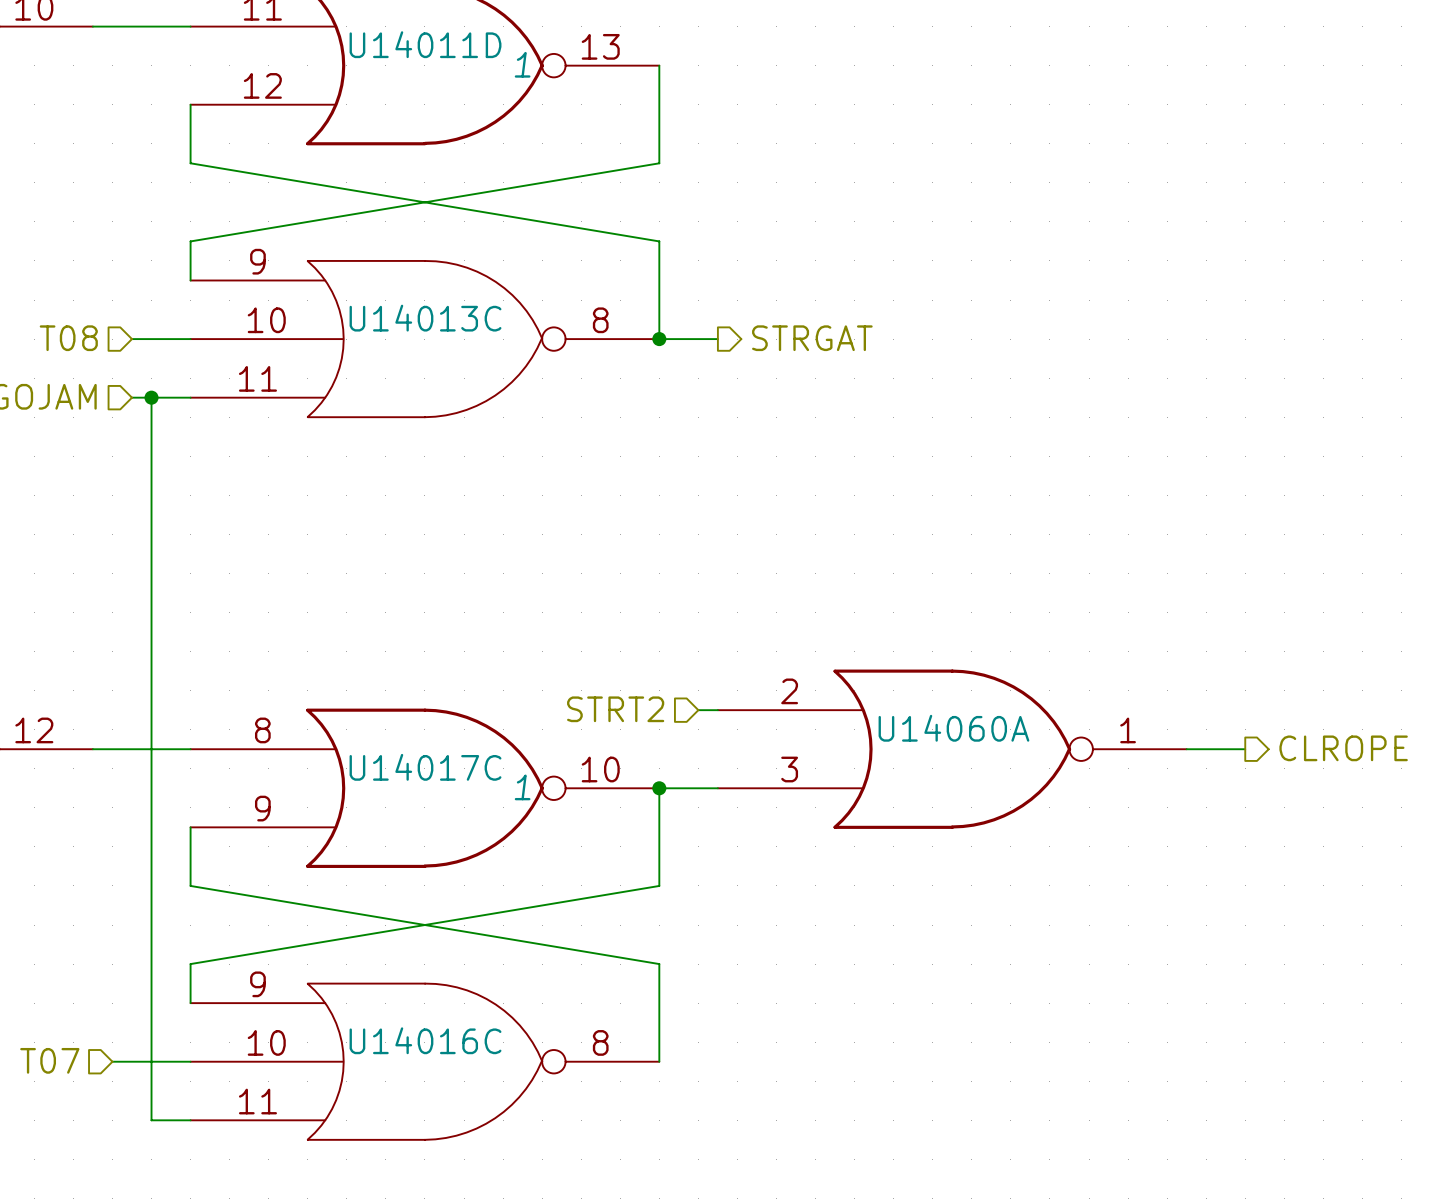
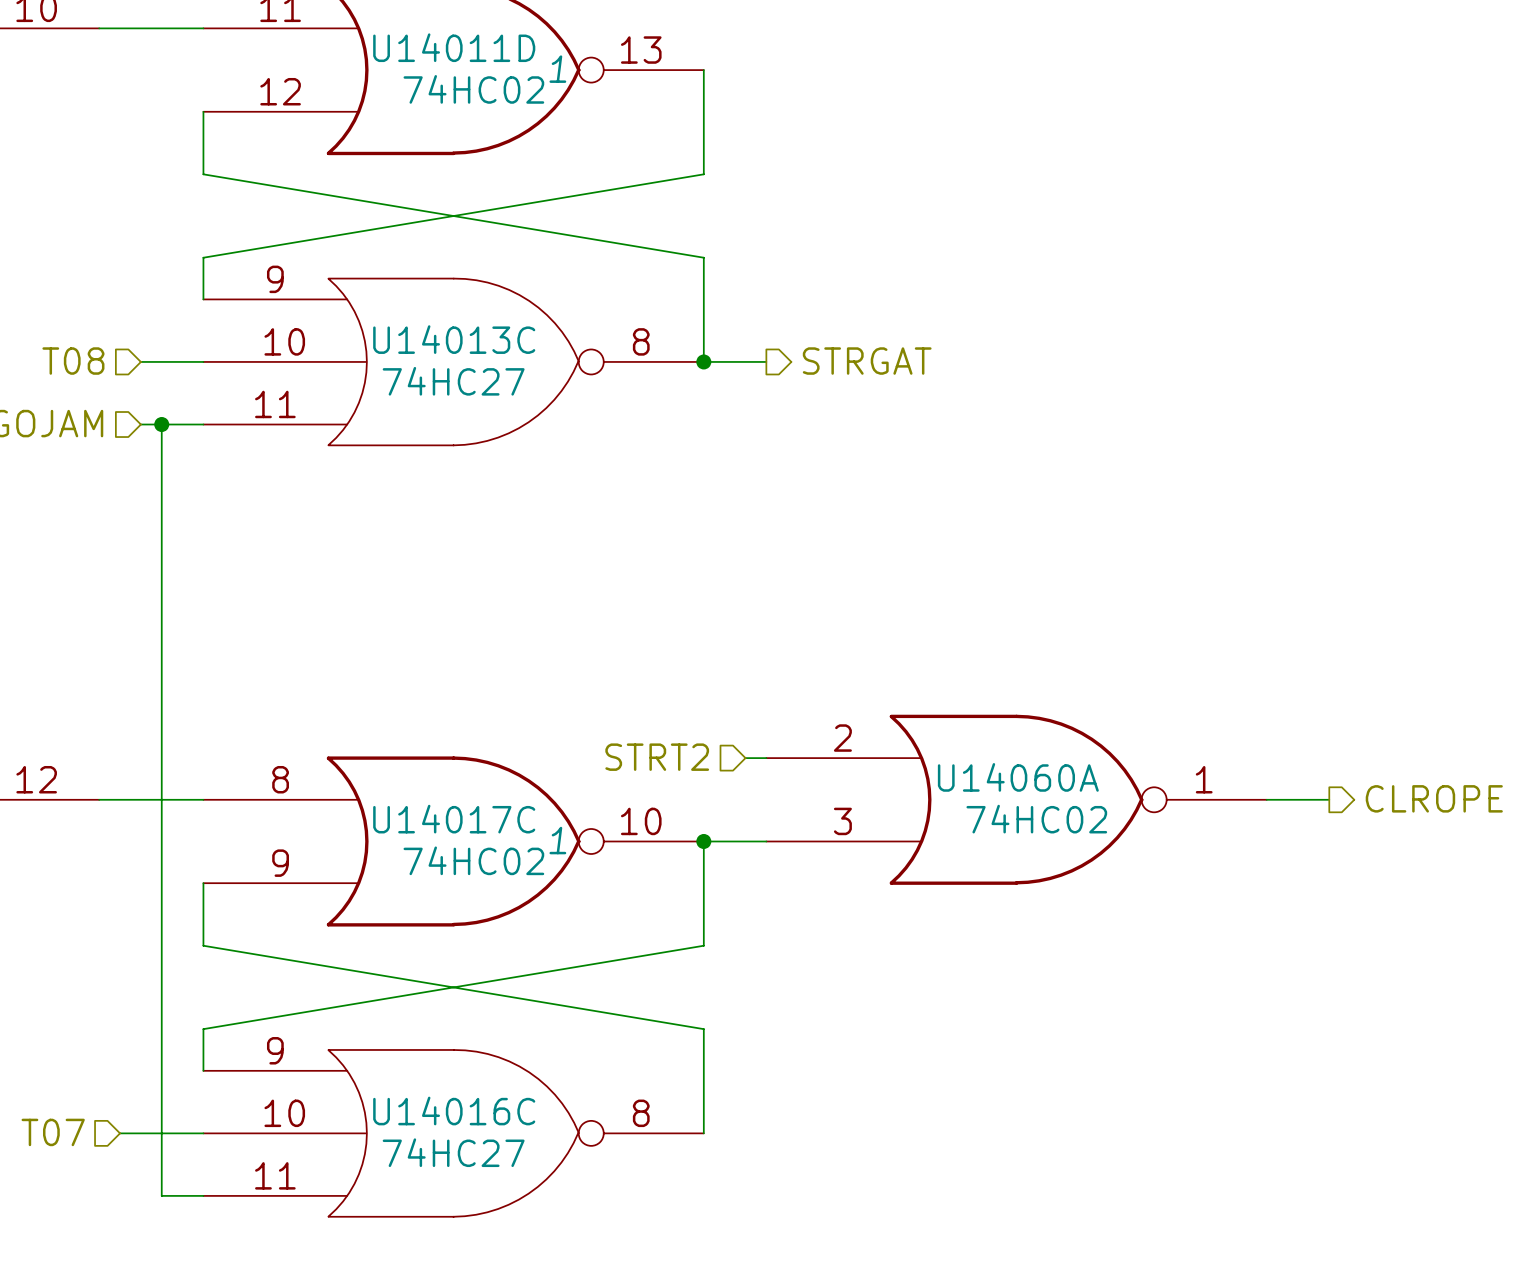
U14011D value: none -> 74HC02 (473, 89)
U14013C value: none -> 74HC27 (453, 381)
U14060A value: none -> 74HC02 (1036, 819)
U14017C value: none -> 74HC02 (473, 860)
U14016C value: none -> 74HC27 (453, 1152)

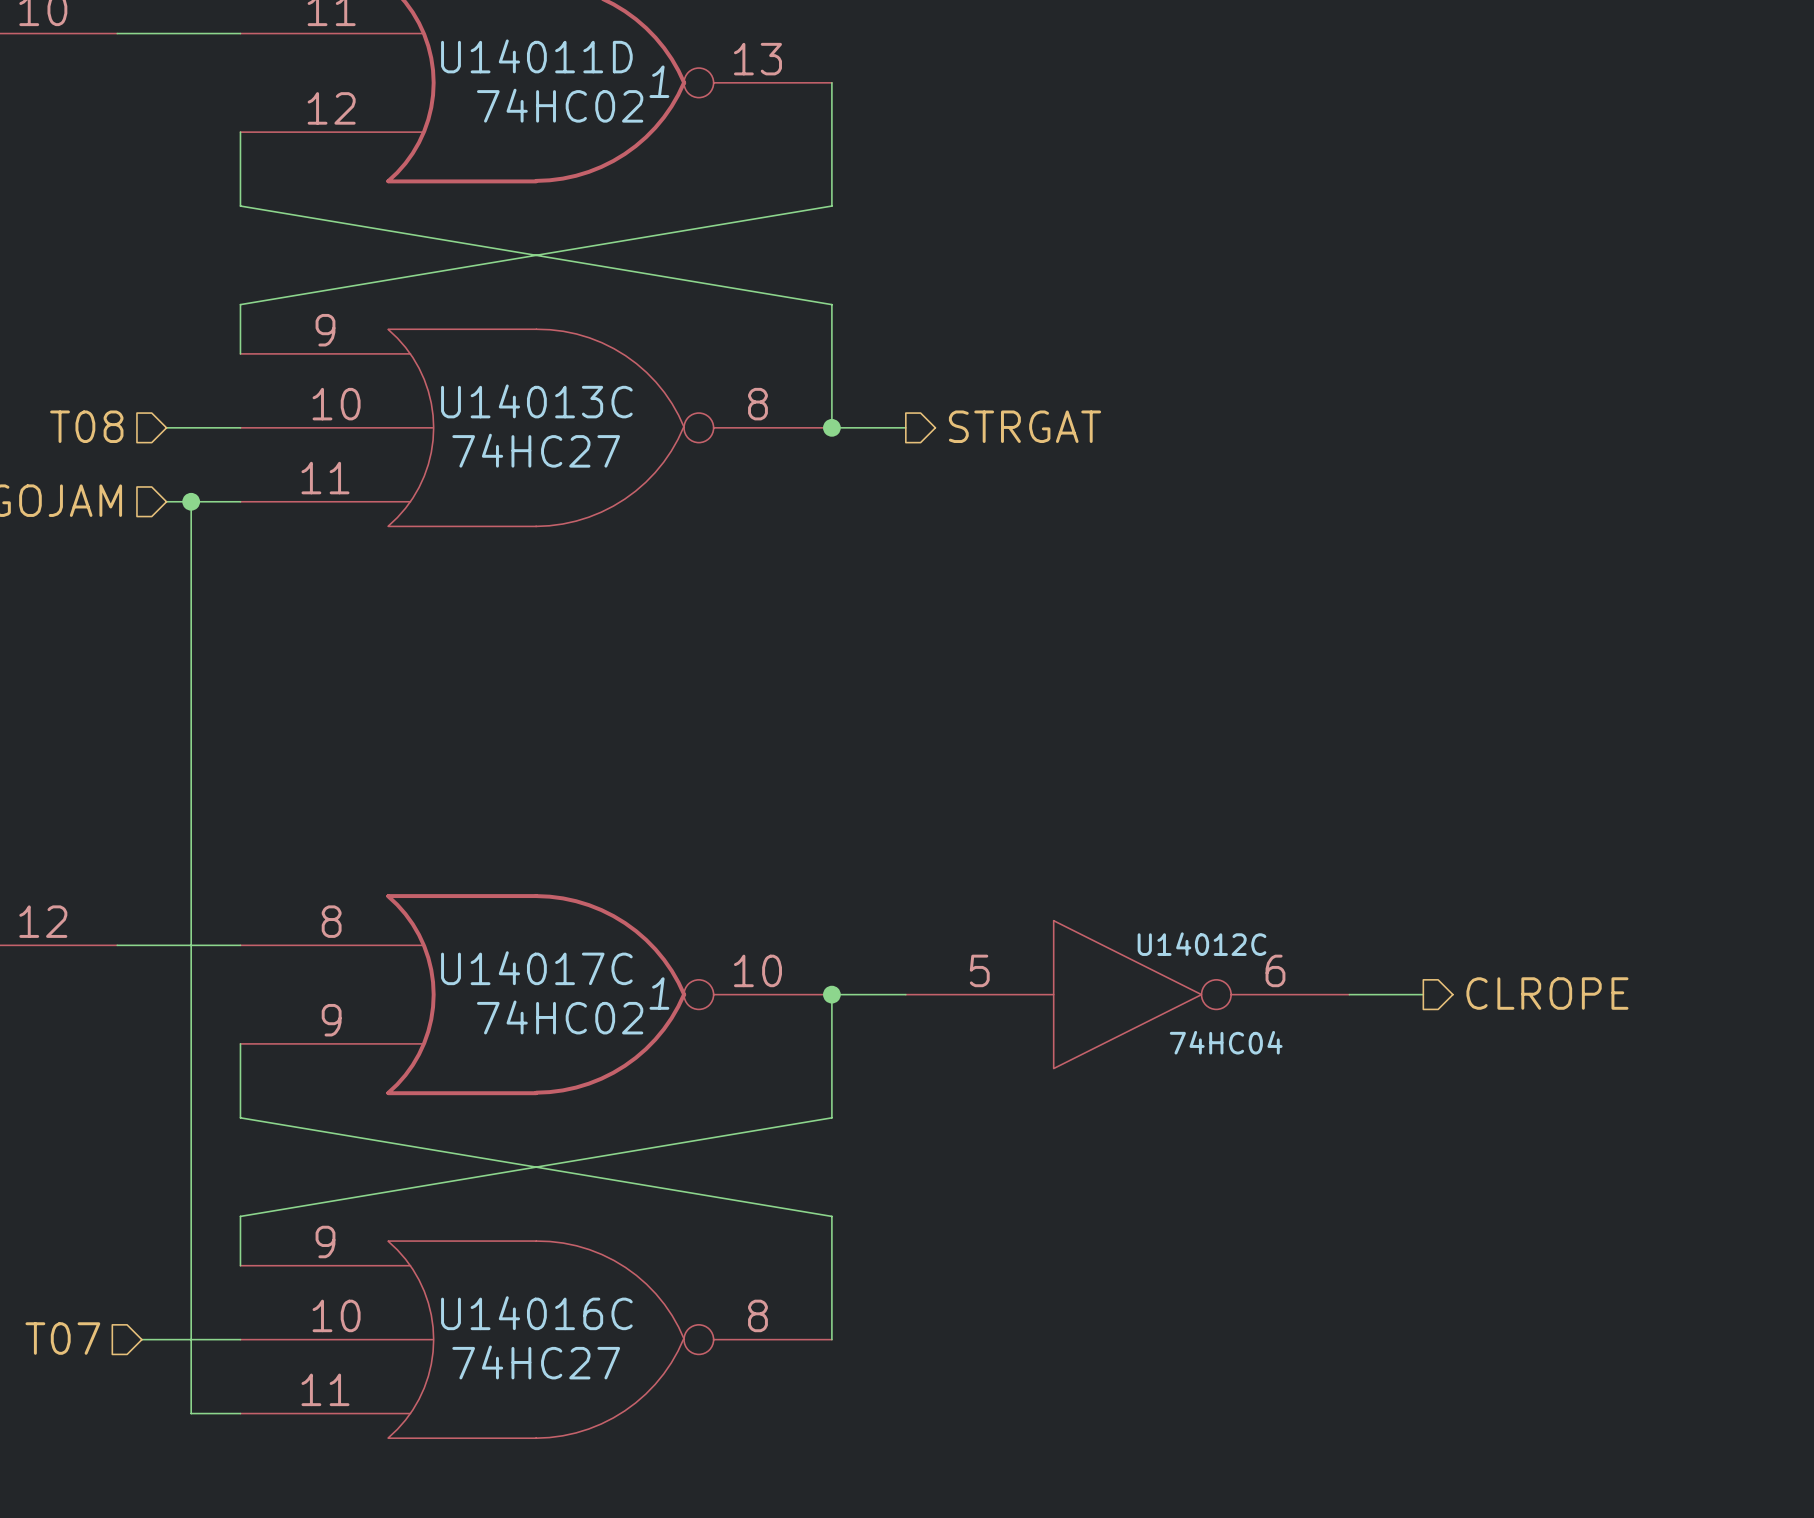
hierarchical label: STRT2 (657, 757) -> none
wire: (745, 758) (766, 758) -> none
hierarchical label position: CLROPE (1434, 798) -> CLROPE (1547, 993)
U14060A: 74HC02 (1016, 799) -> none
wire: (1266, 799) (1329, 799) -> (1349, 994) (1423, 994)
U14012C: none -> 74HC04 (1127, 994)

